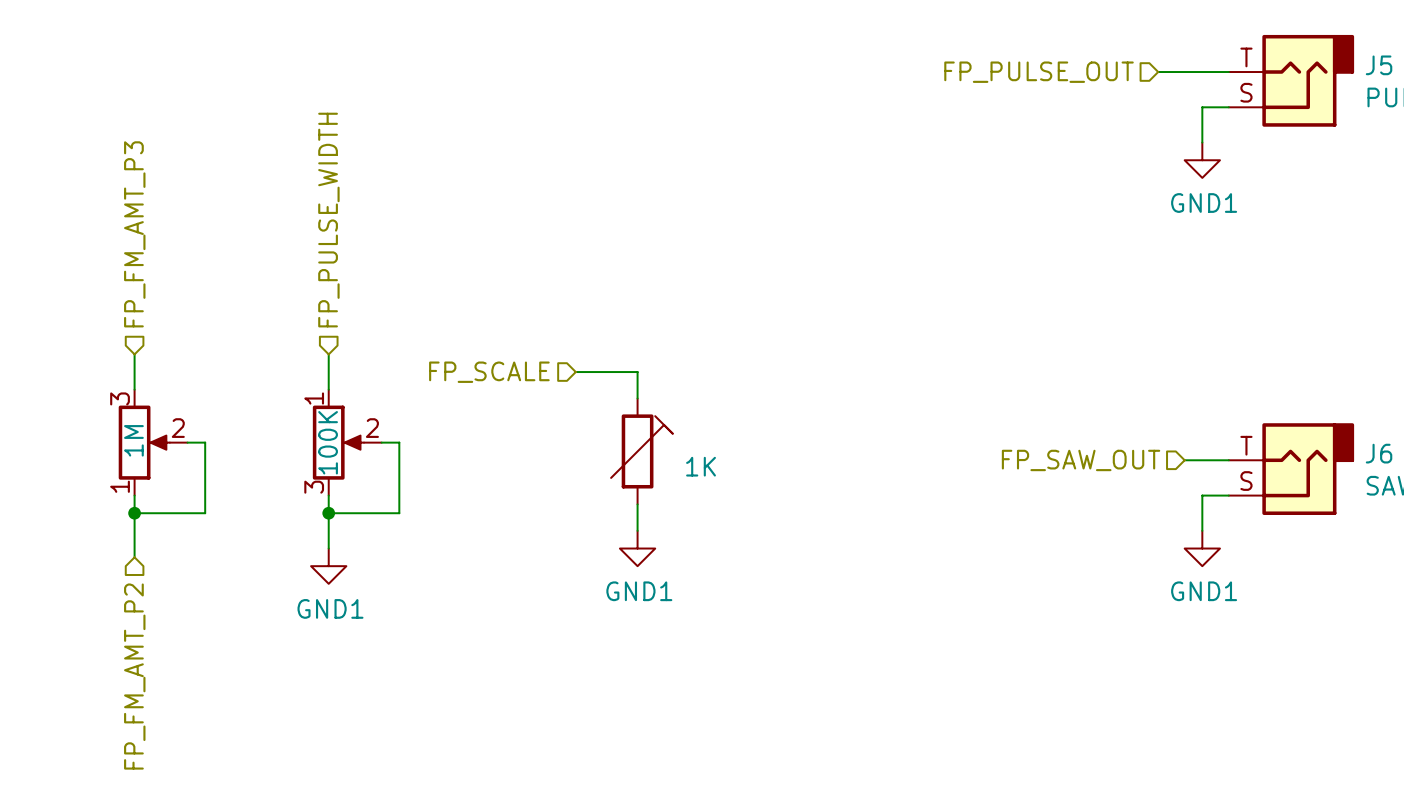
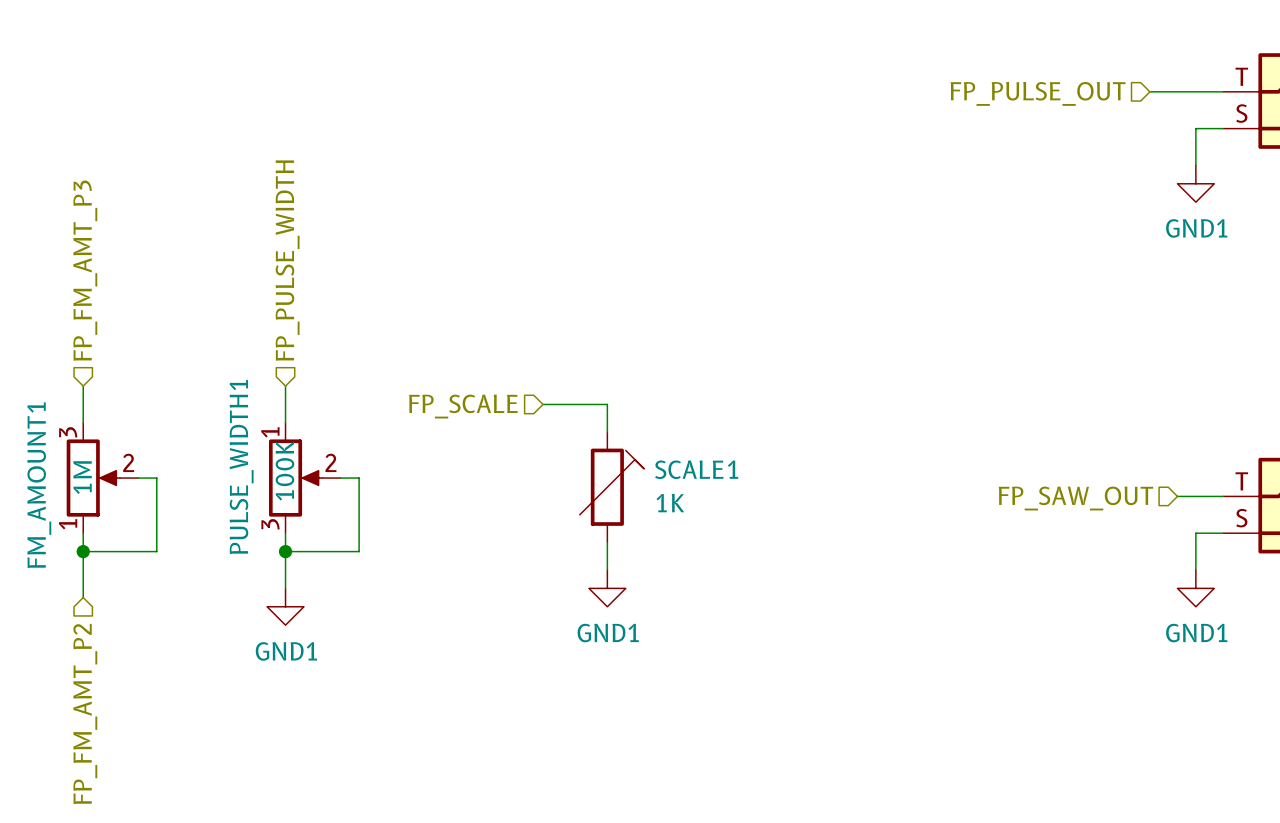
SCALE1 name: none -> SCALE1 (696, 469)
PULSE_WIDTH1 name: none -> PULSE_WIDTH1 (241, 466)
FM_AMOUNT1 name: none -> FM_AMOUNT1 (39, 485)

